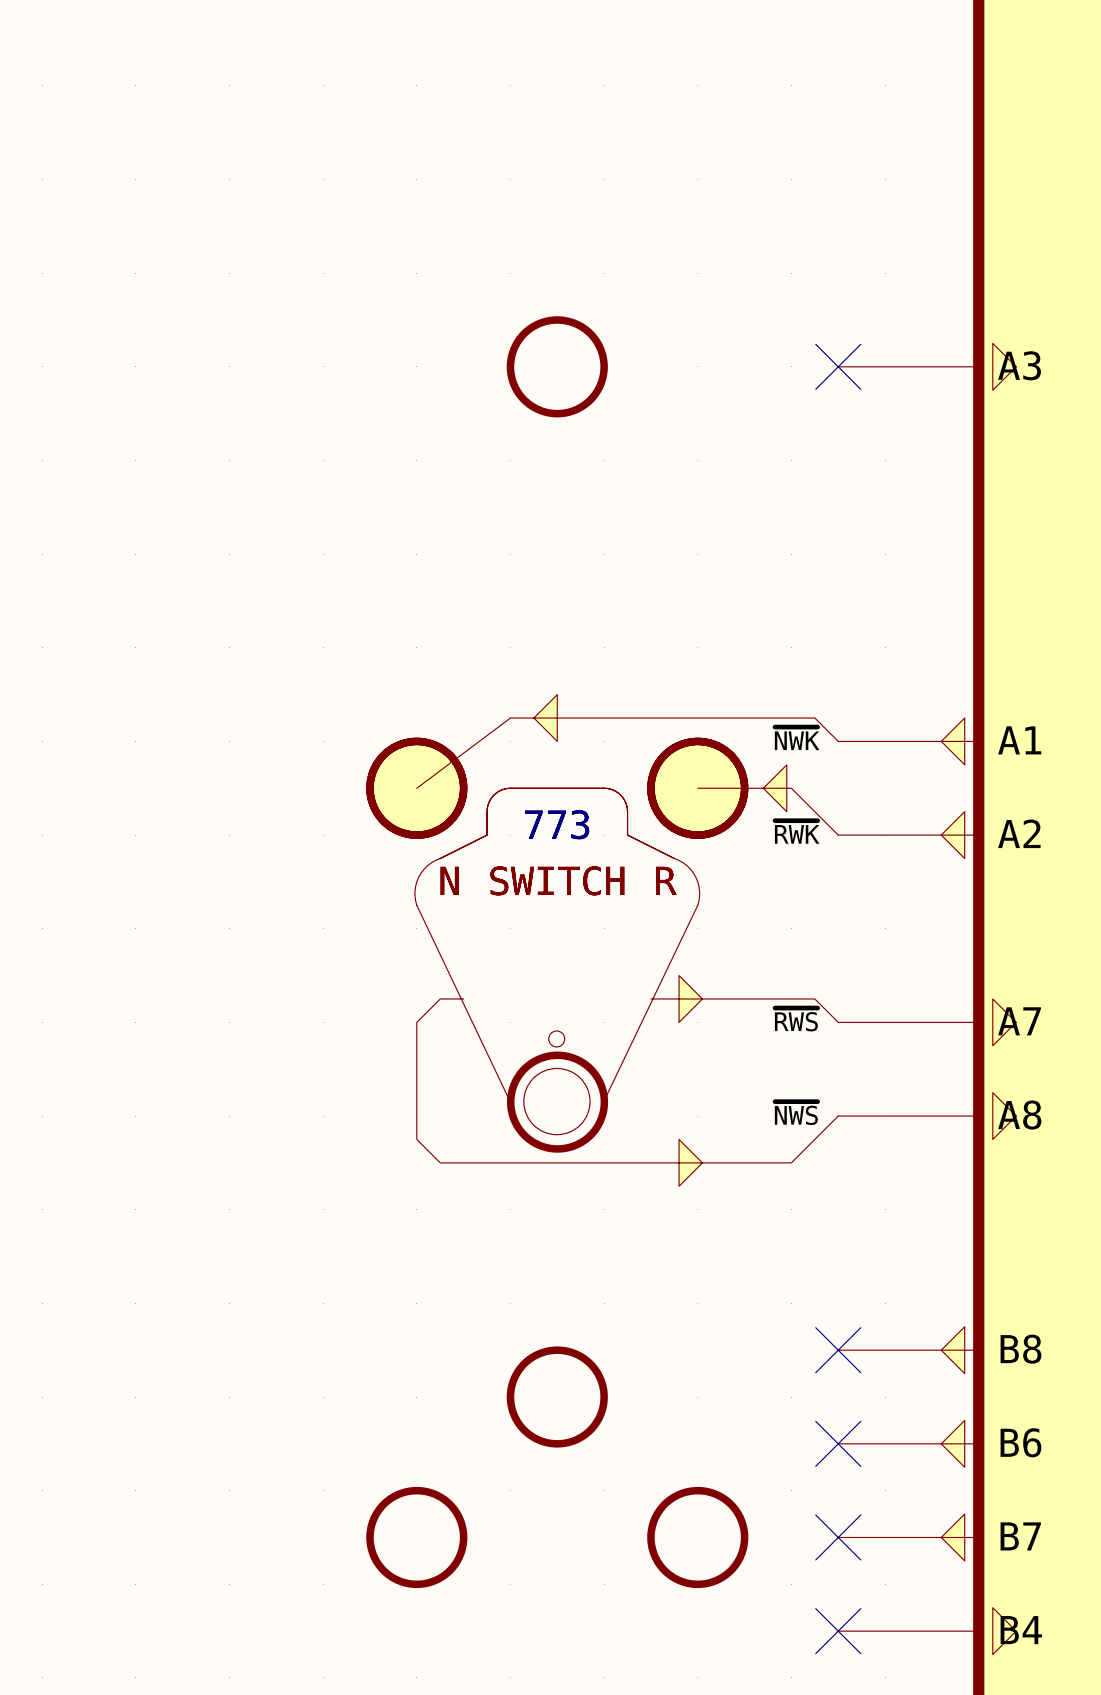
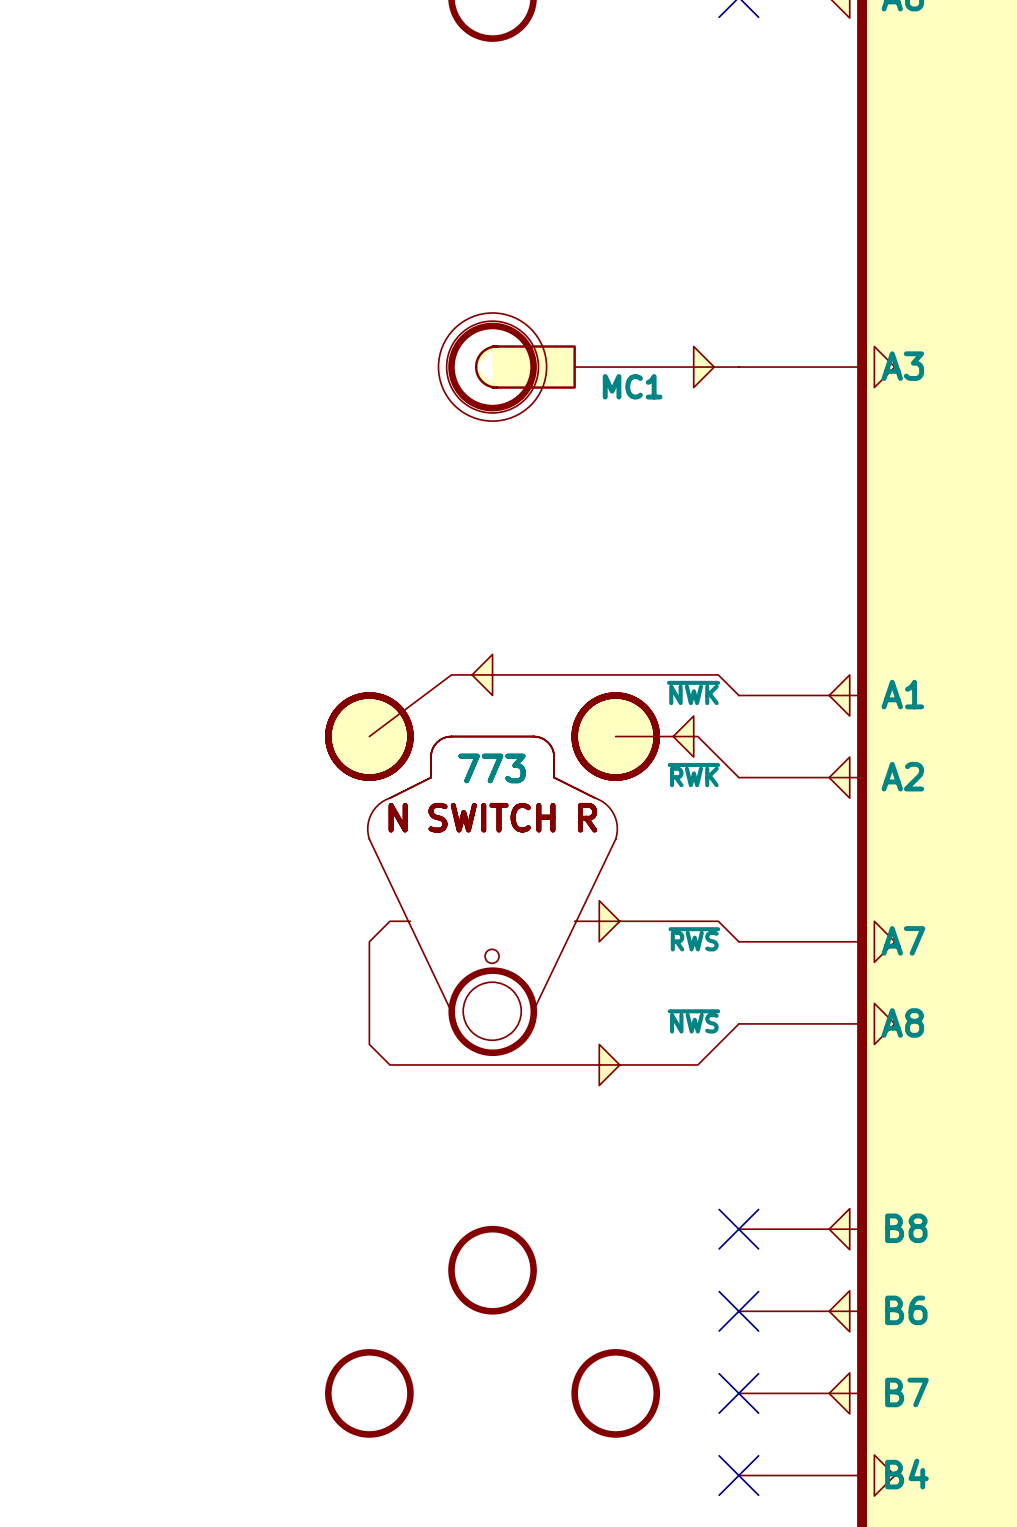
part: none -> MC1 (588, 367)
no-connect mark: (838, 366) -> none

